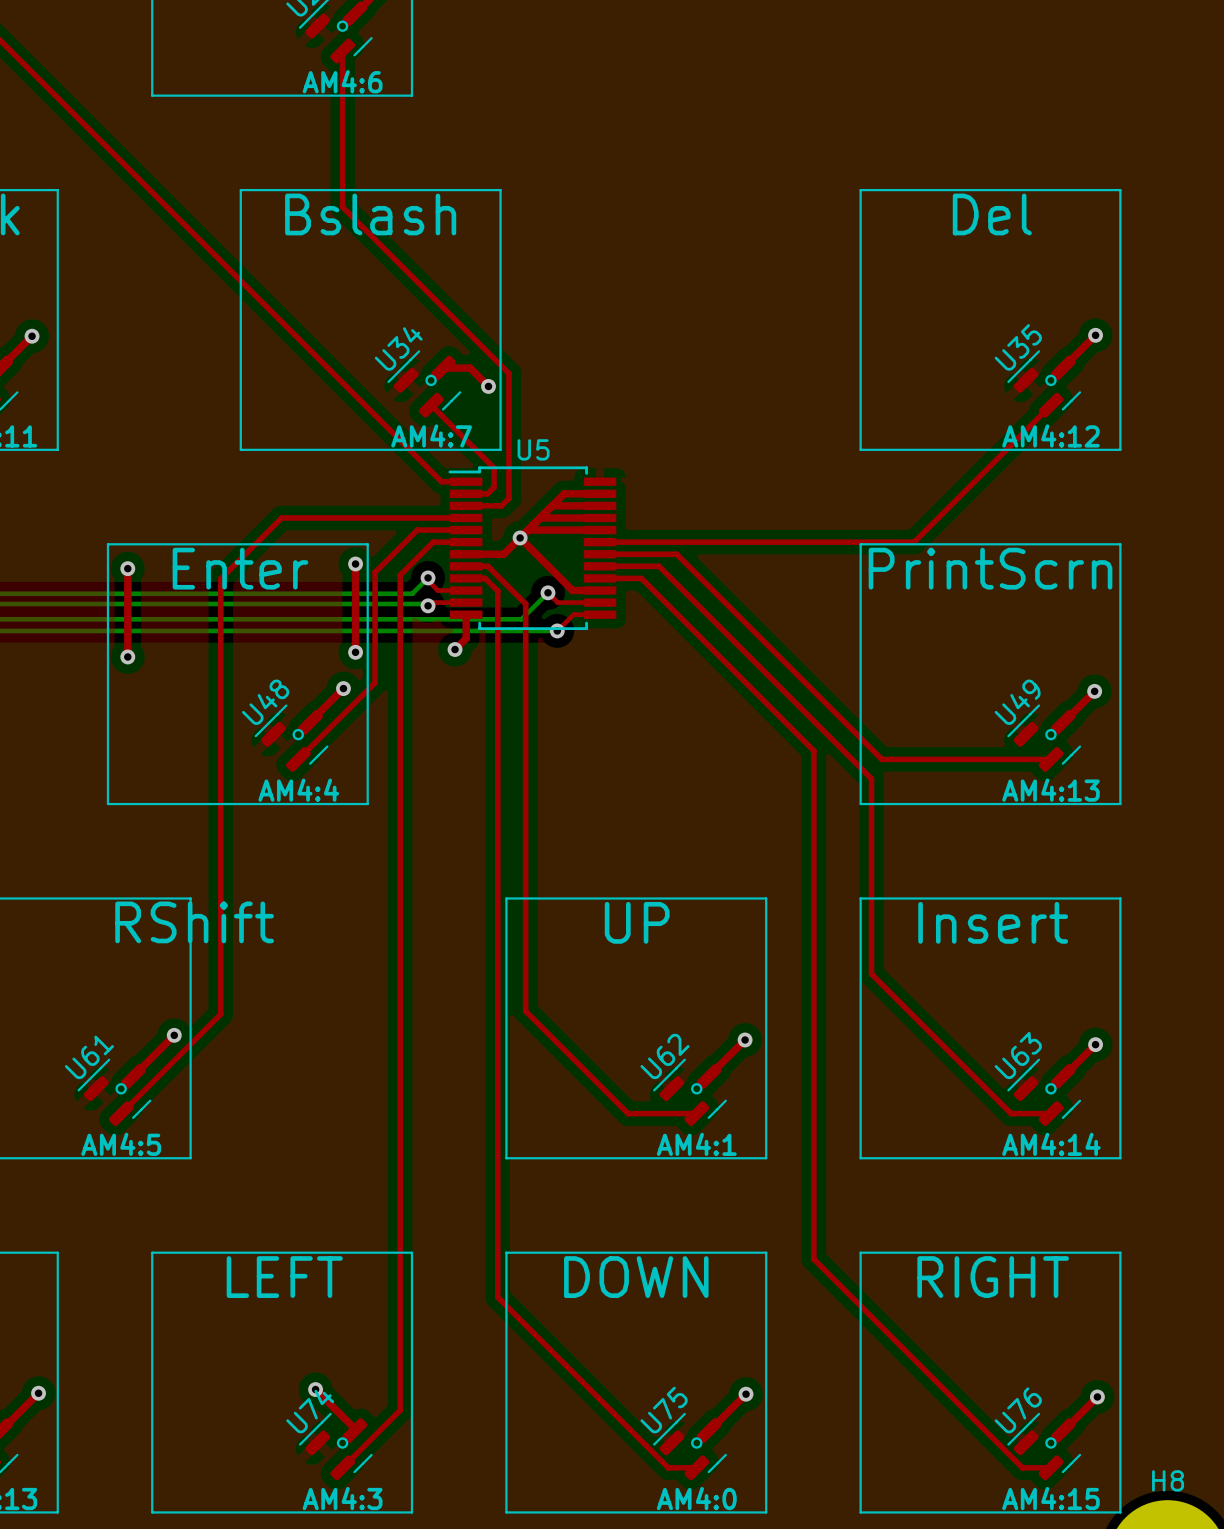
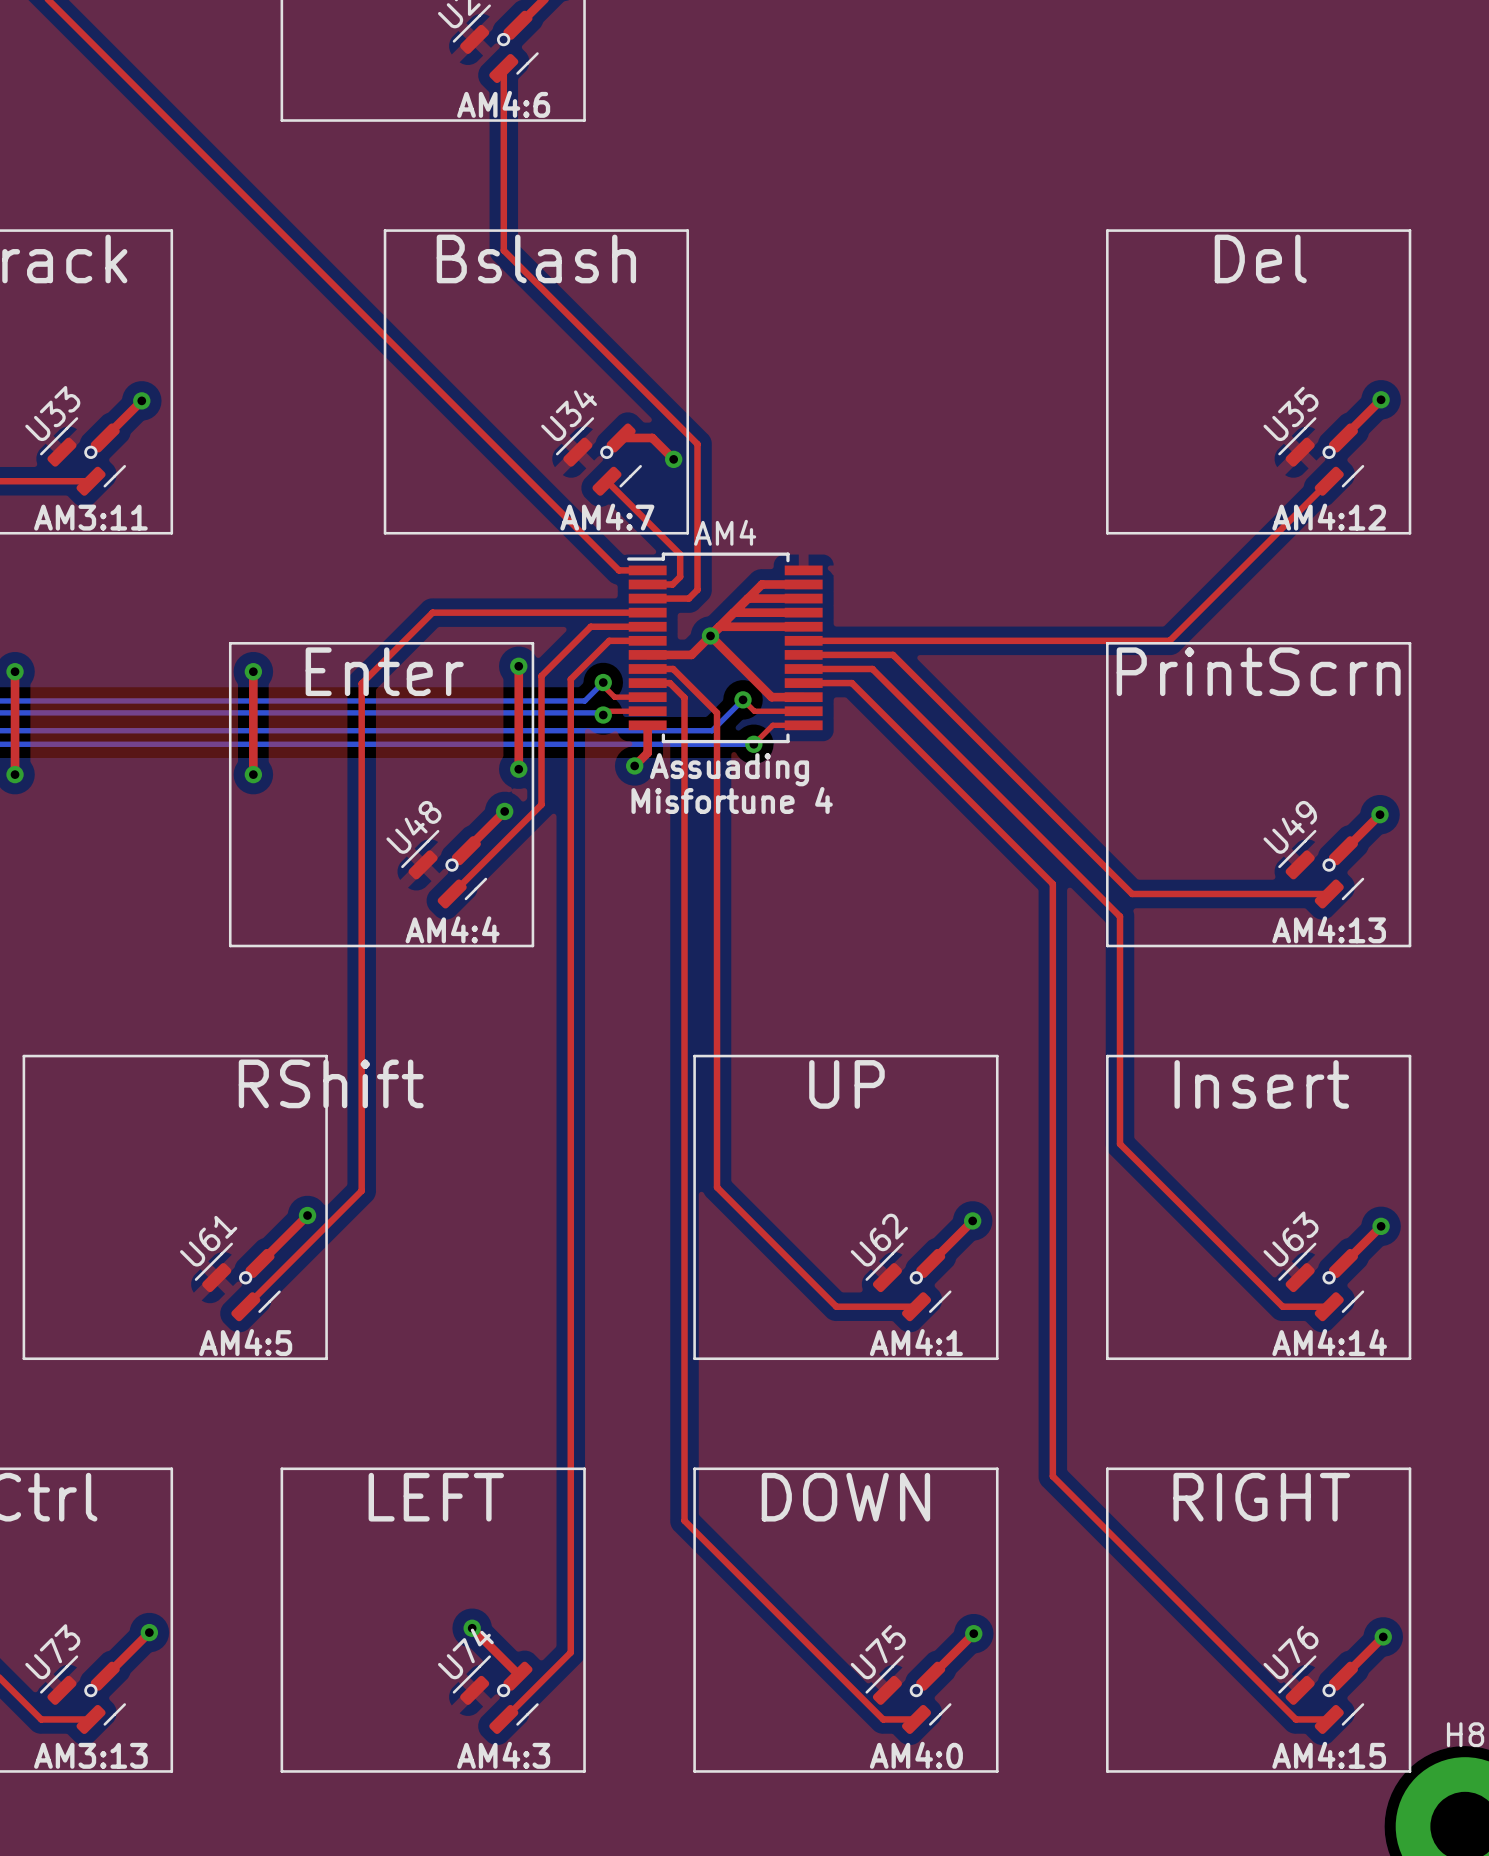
U5 name: U5 (533, 449) -> AM4 (725, 532)
text: none -> Assuading (729, 769)
text: none -> Misfortune 4 (732, 800)

